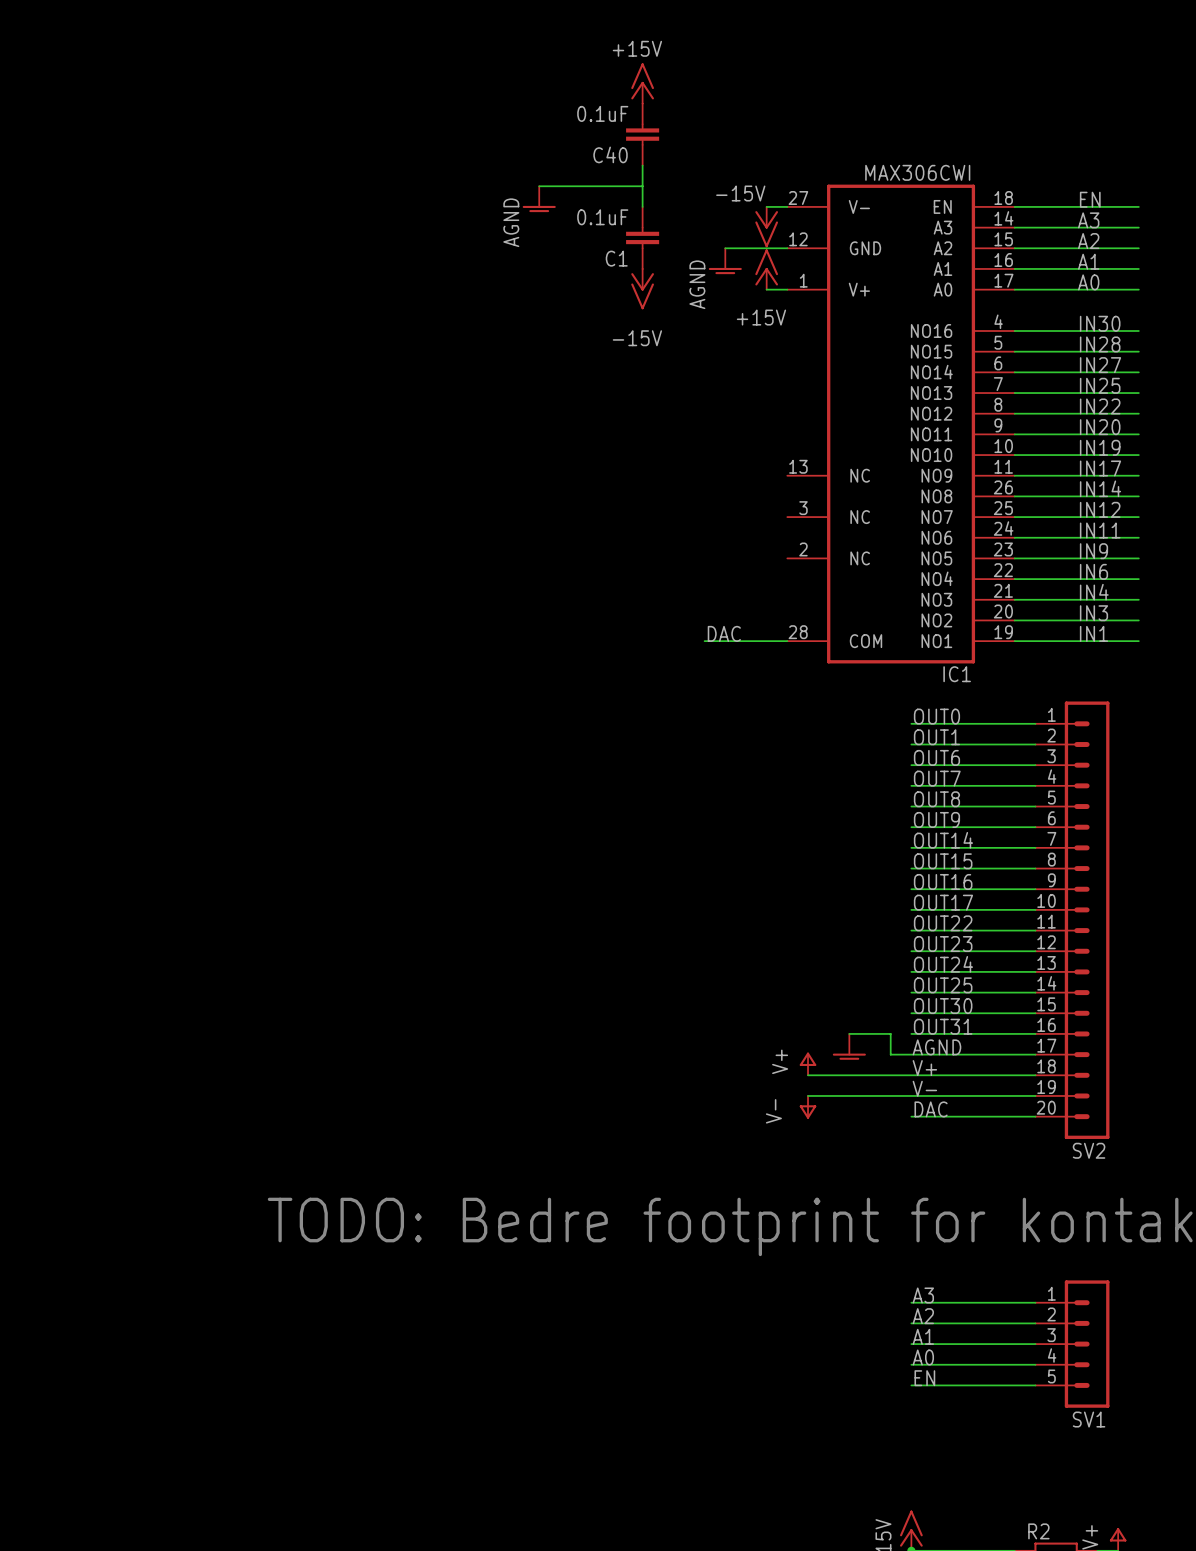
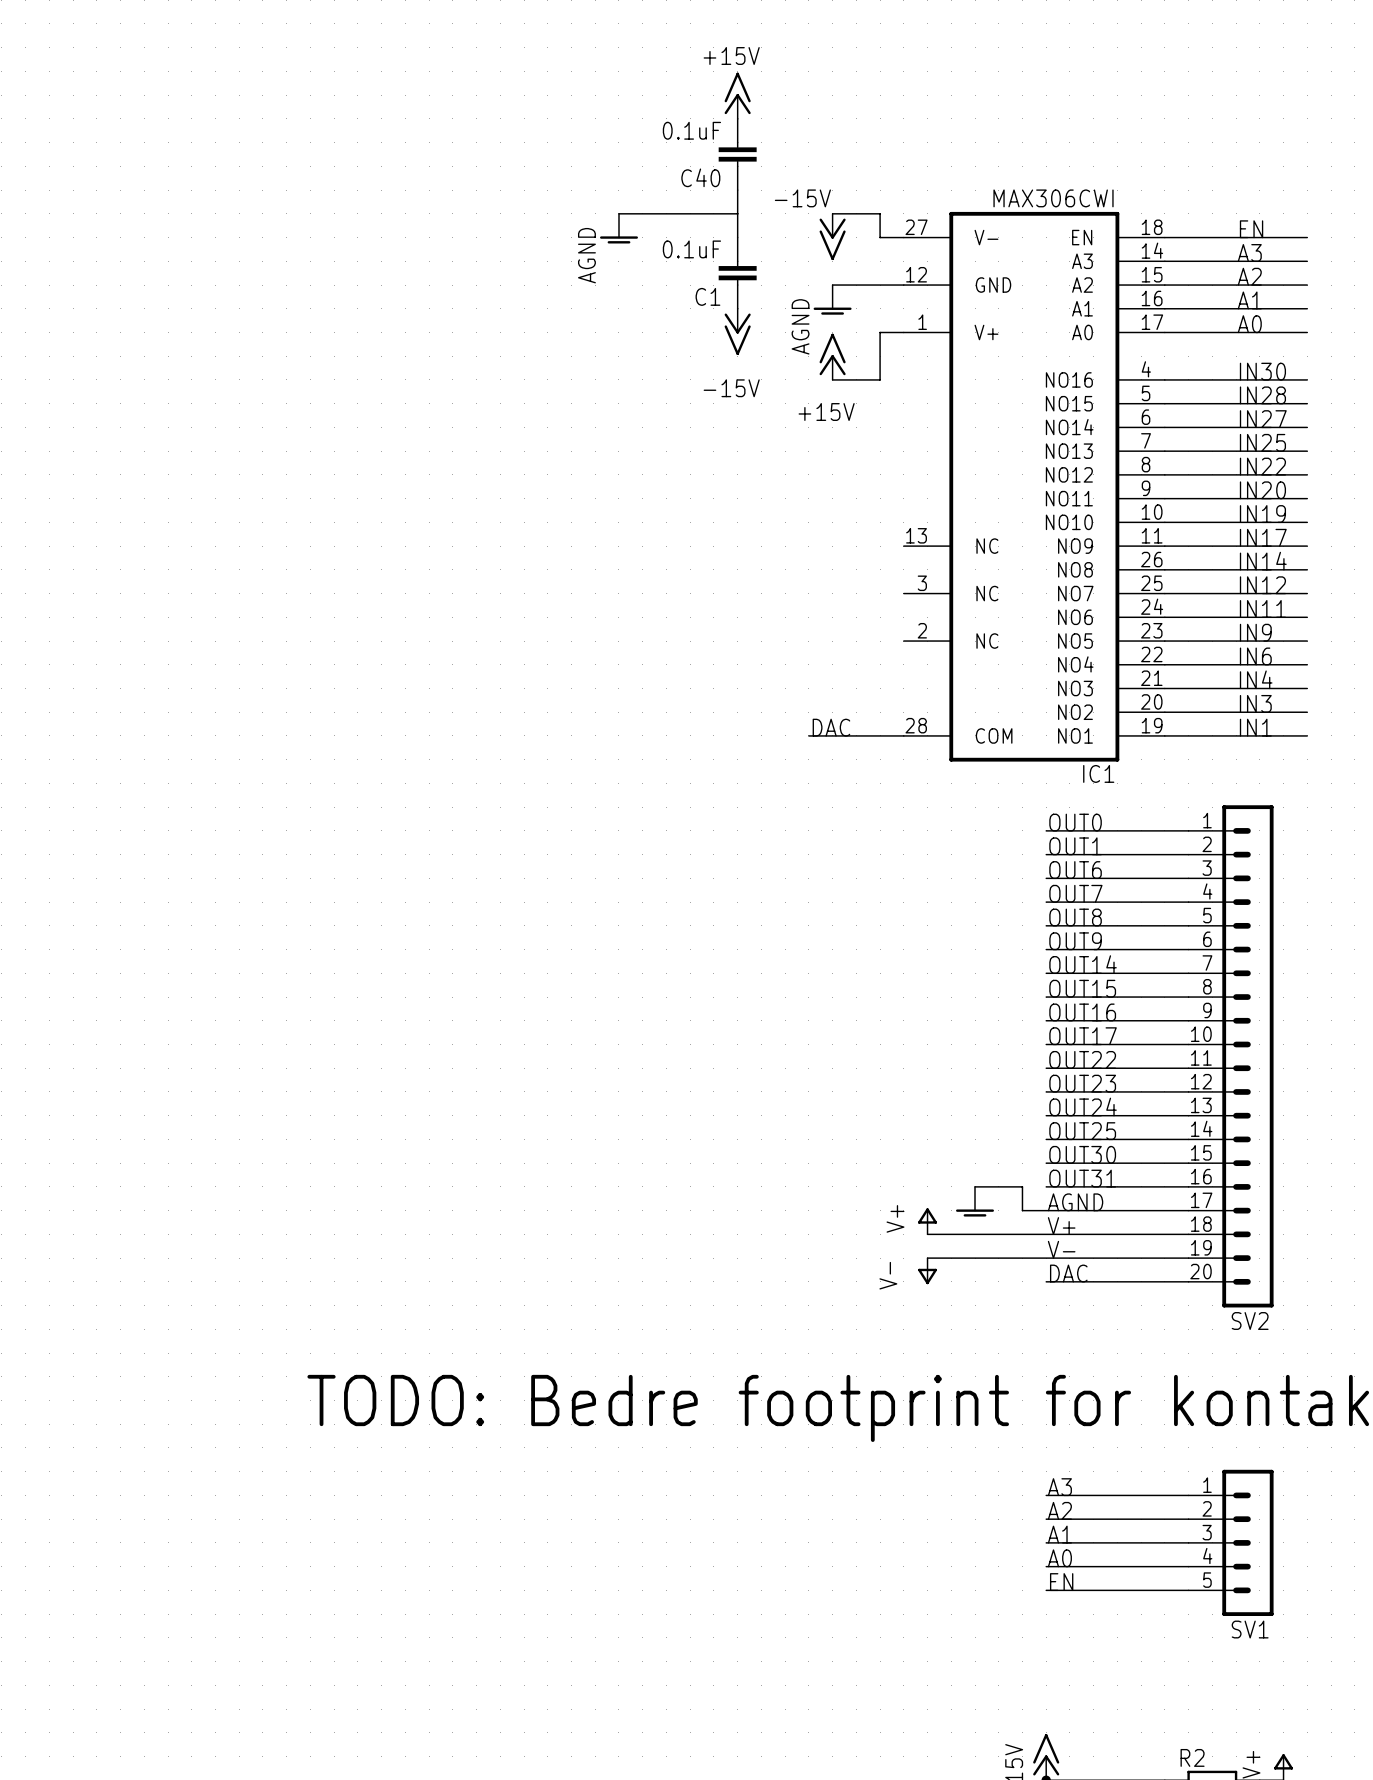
wire: none -> (832, 213) (880, 213) (880, 237)
power symbol position: -15V (766, 227) -> -15V (832, 236)
power symbol position: +15V (766, 269) -> +15V (832, 356)
wire: none -> (880, 332) (880, 379) (832, 379)

